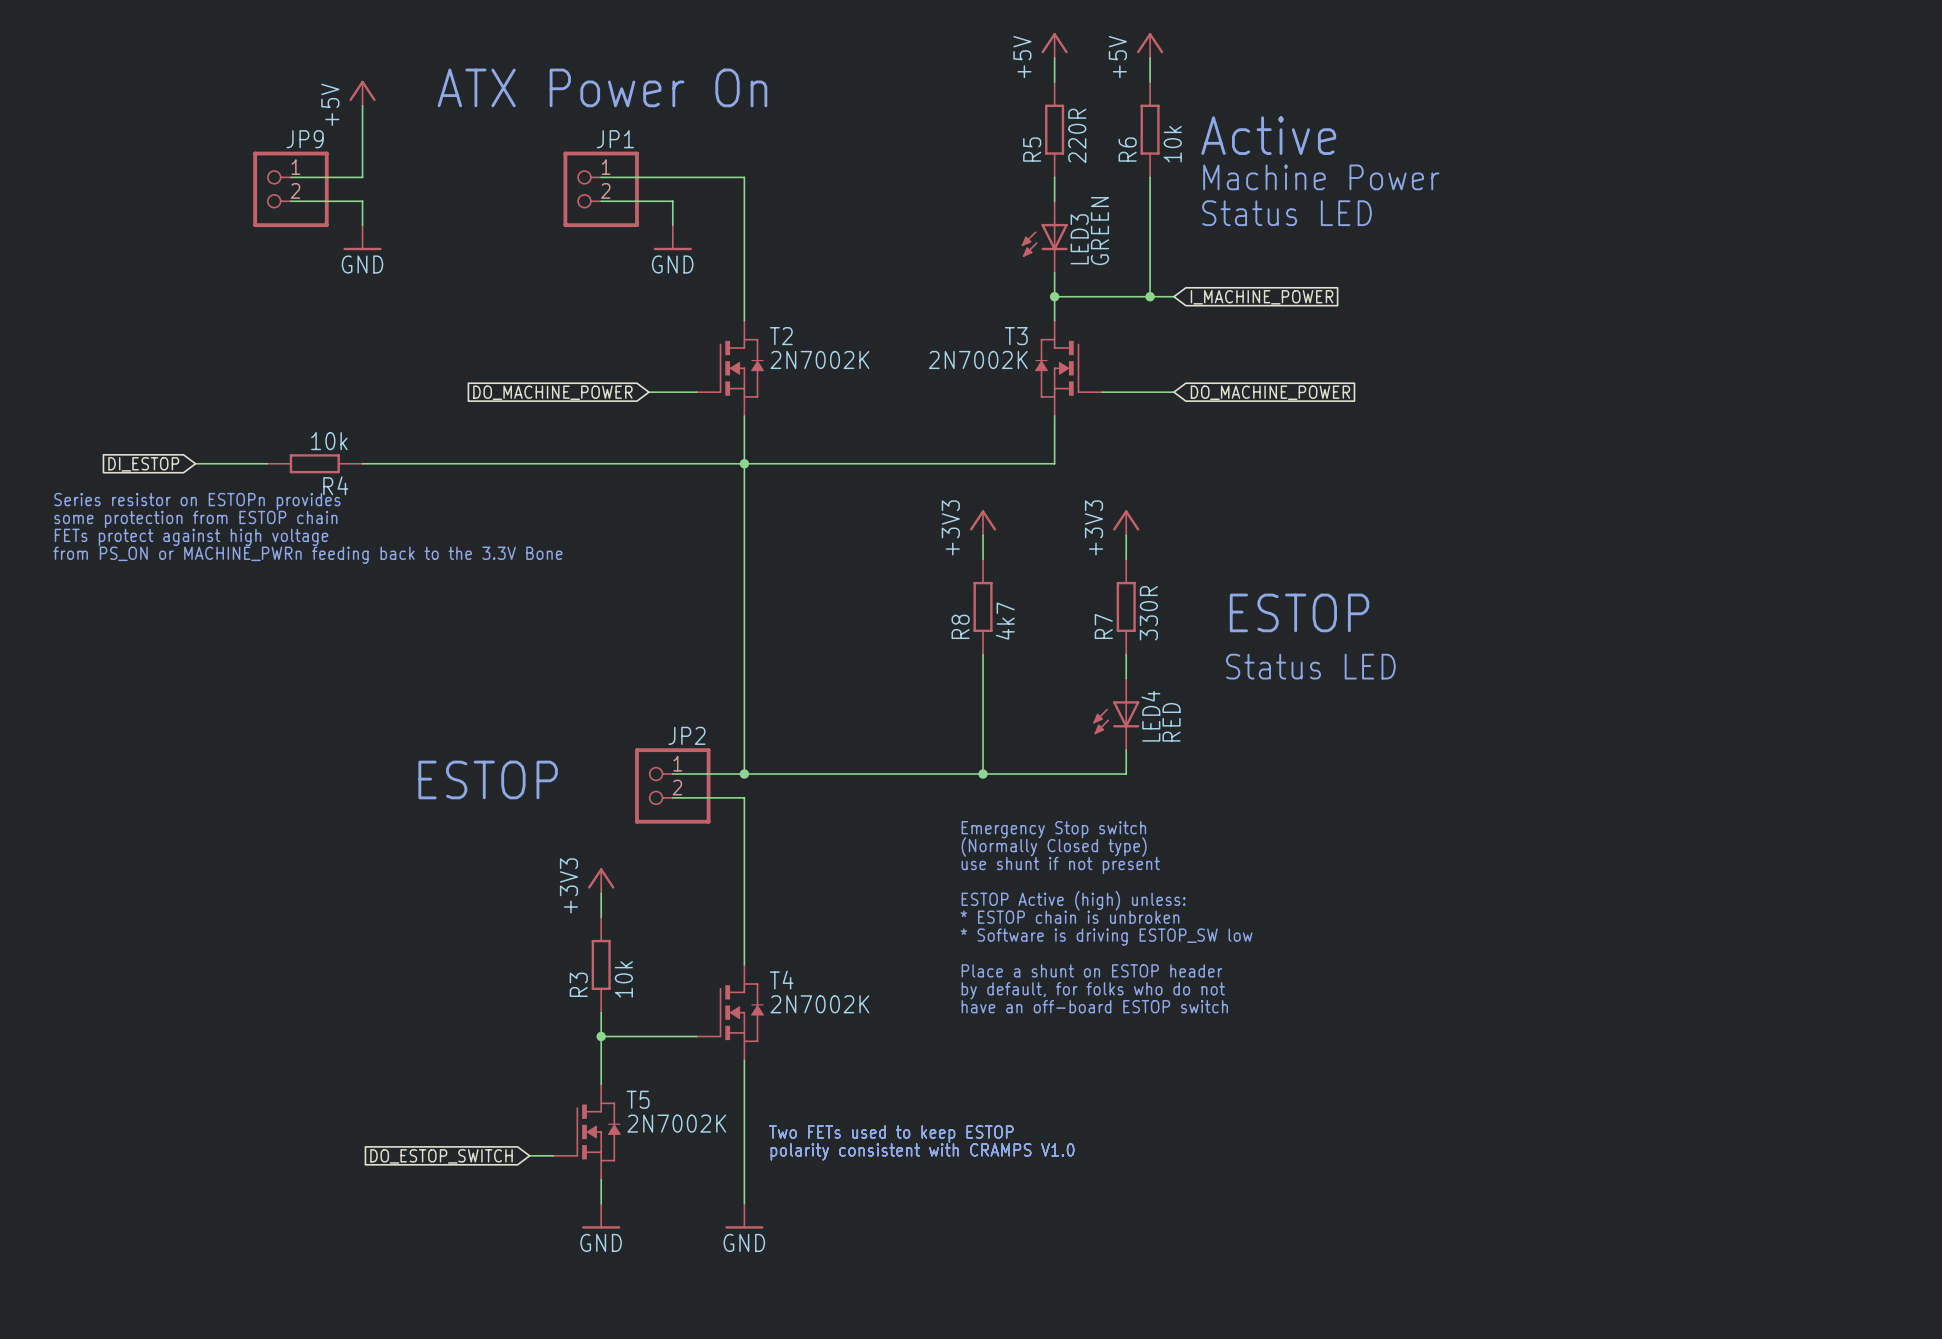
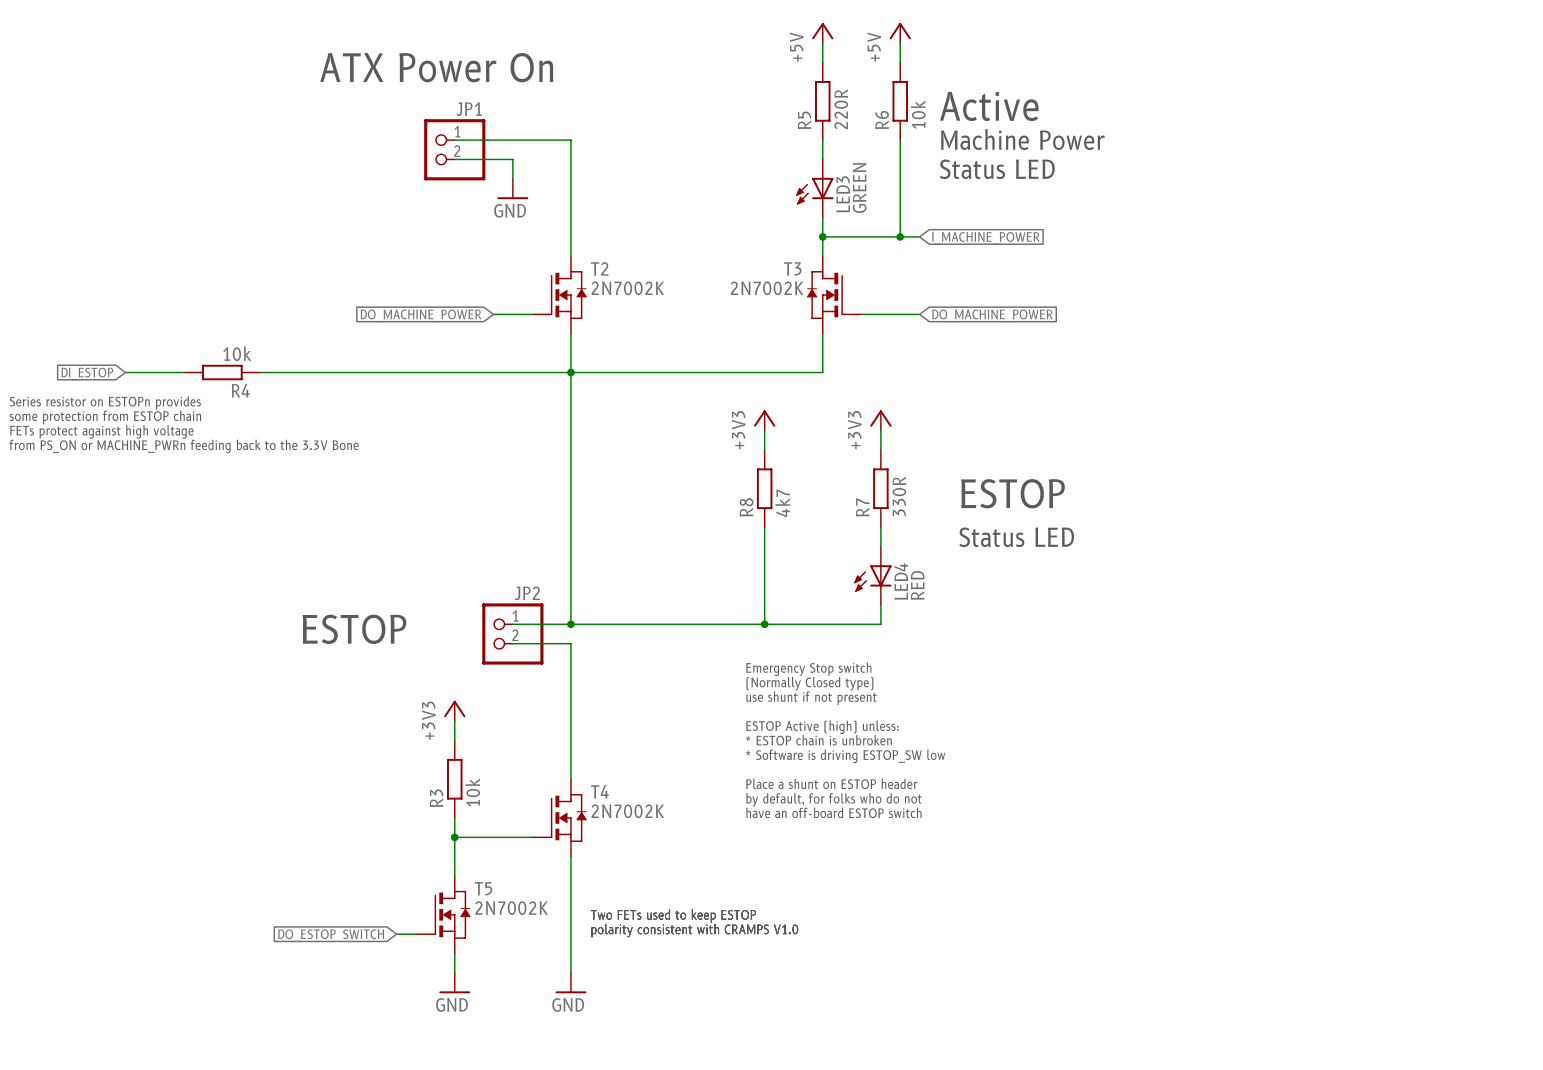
power symbol: +5V (362, 93) -> none
wire: (362, 105) (362, 177) (290, 177) -> none
JP9: (290, 189) -> none
wire: (290, 201) (362, 201) (362, 225) -> none
power symbol: GND (362, 237) -> none

